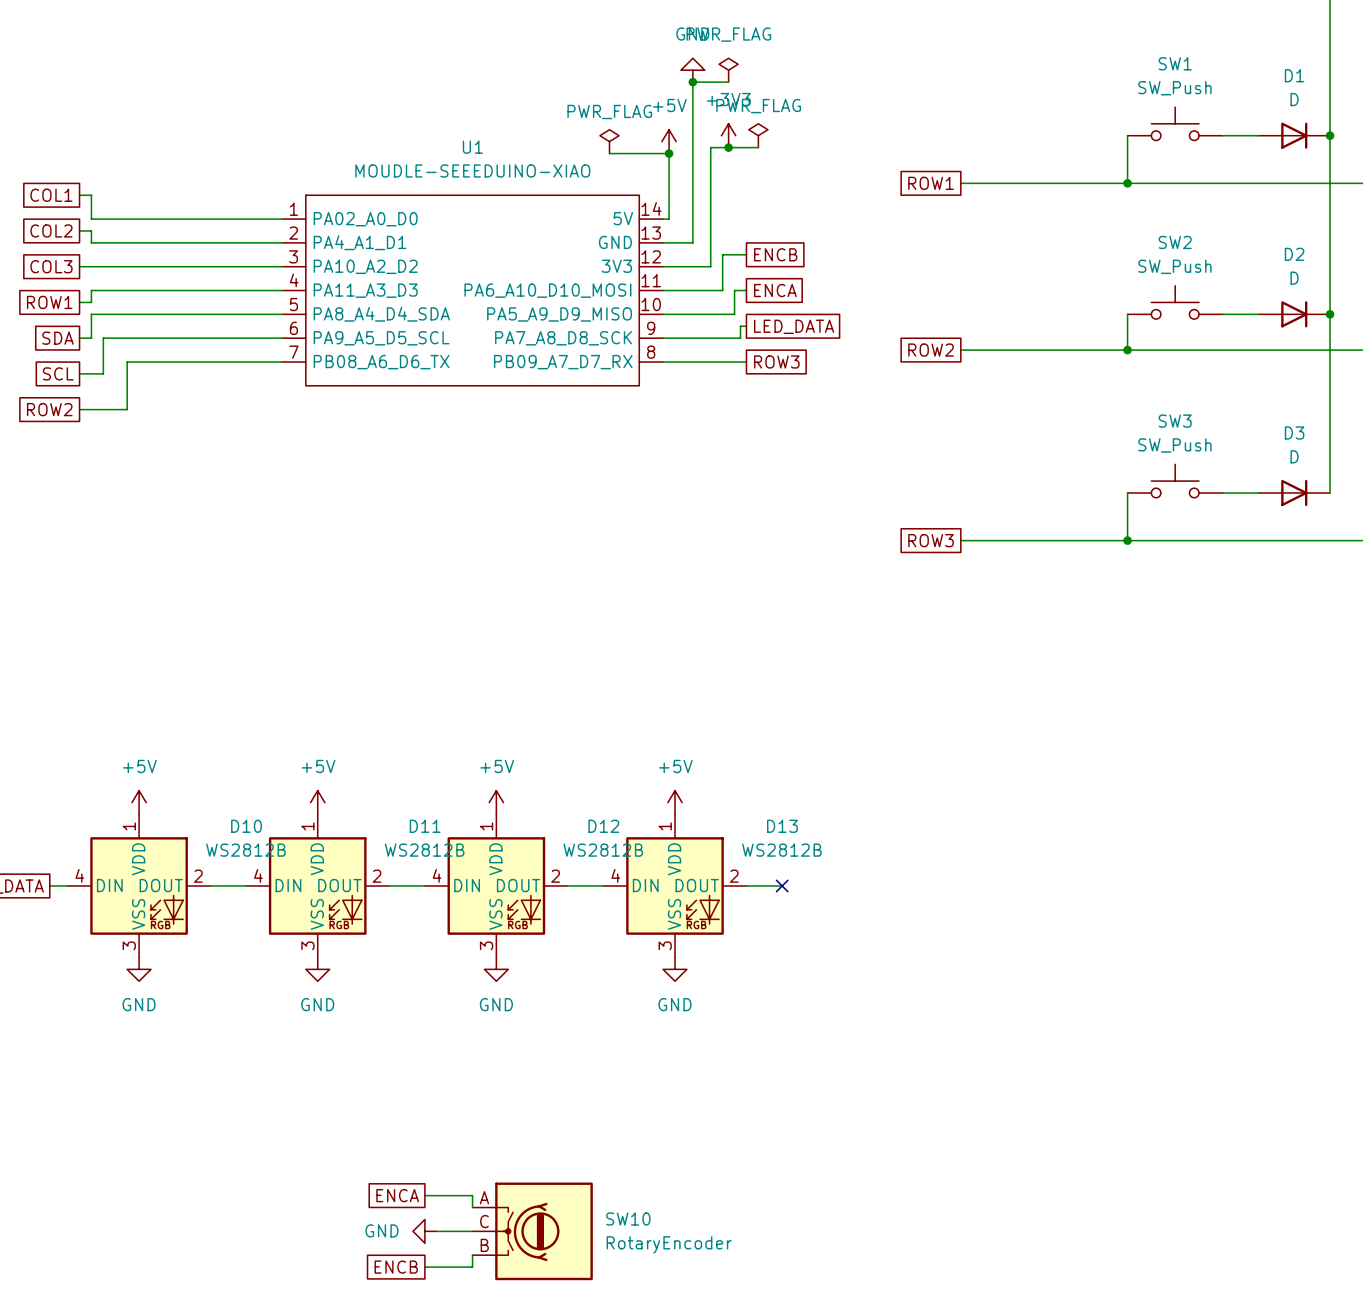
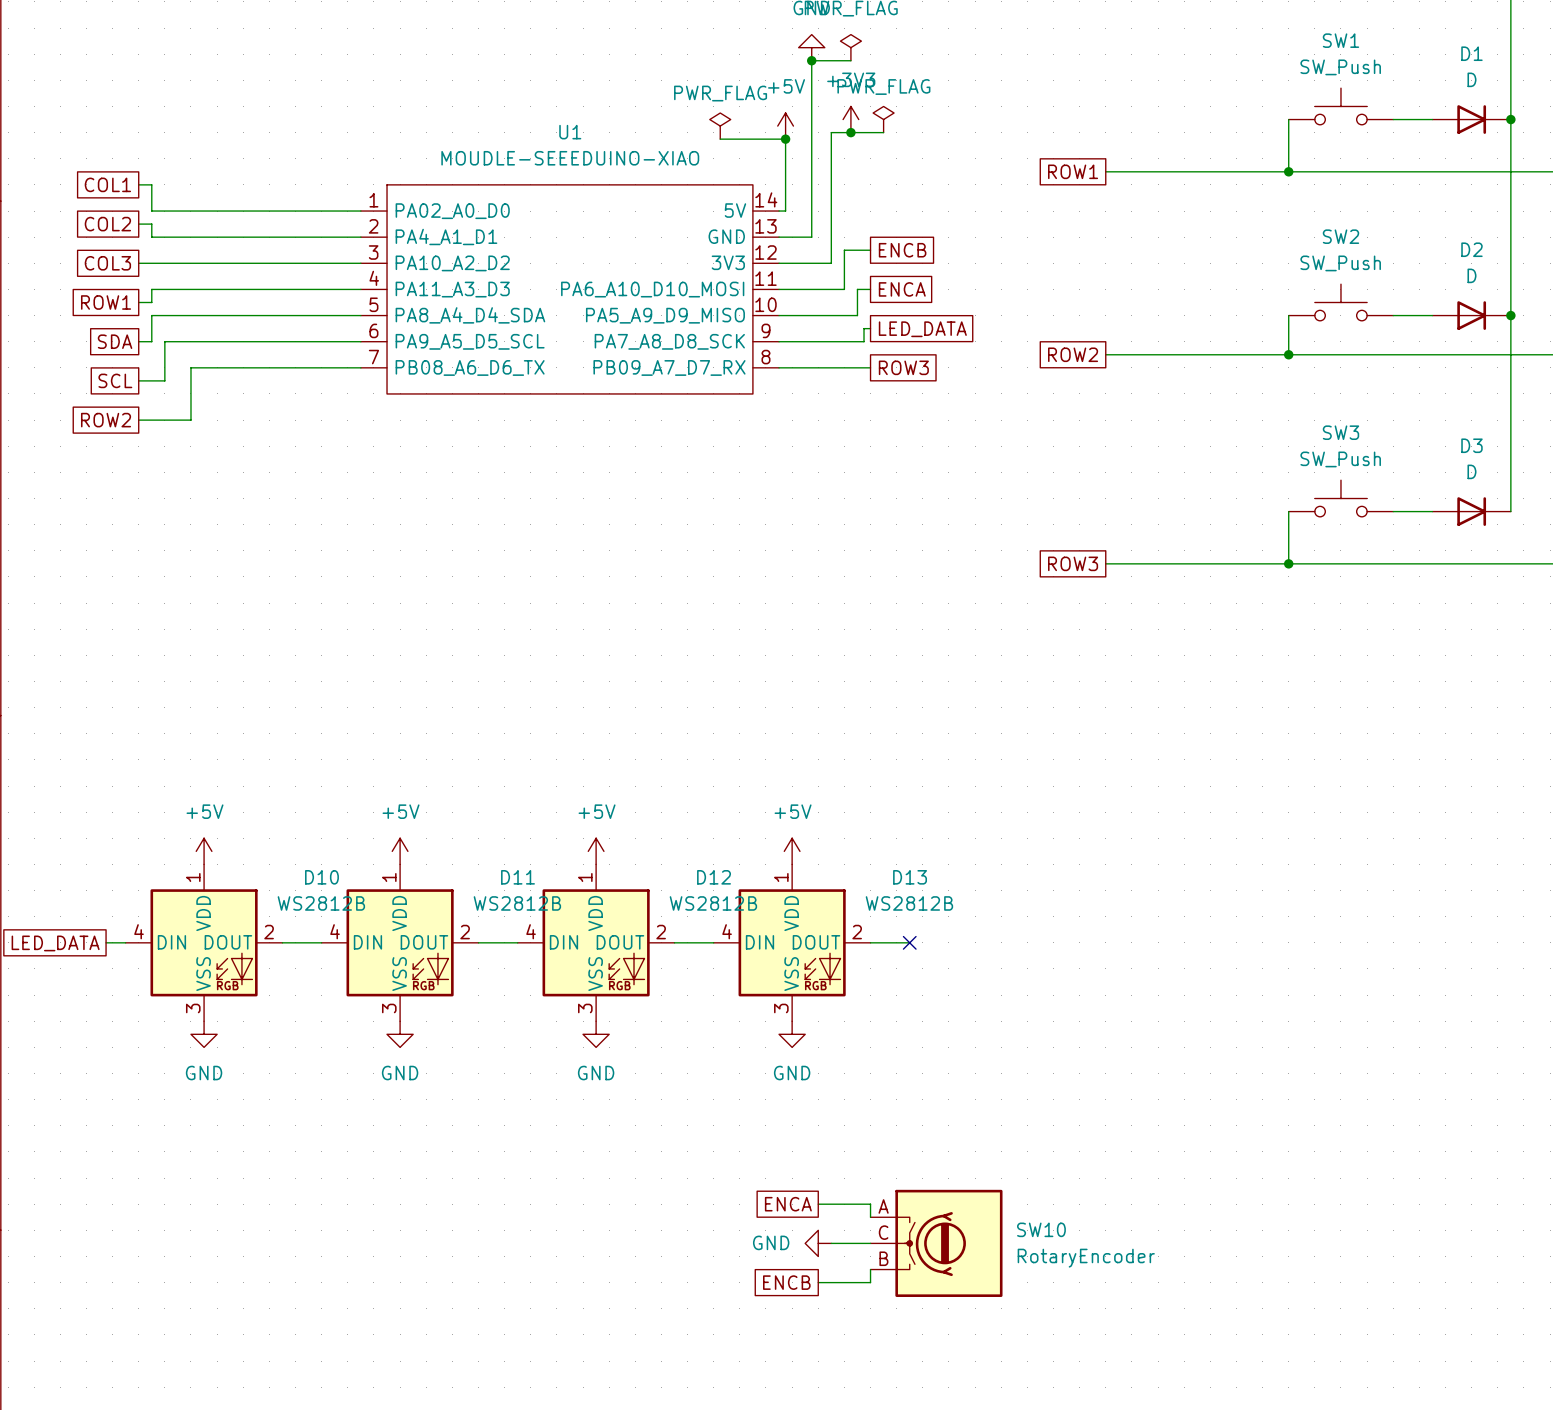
global label: none -> ENCA (788, 1204)
wire: none -> (818, 1204) (870, 1204) (870, 1217)
power symbol: none -> GND (818, 1243)
wire: none -> (831, 1243) (870, 1243)
wire: none -> (870, 1269) (870, 1282) (818, 1282)
global label: ENCA (397, 1195) -> none
wire: (424, 1195) (472, 1195) (472, 1207) -> none
global label: none -> ENCB (786, 1282)
power symbol: GND (424, 1231) -> none
wire: (436, 1231) (472, 1231) -> none
SW10 position: (532, 1231) -> (936, 1243)
wire: (472, 1255) (472, 1267) (424, 1267) -> none
global label: ENCB (396, 1267) -> none

